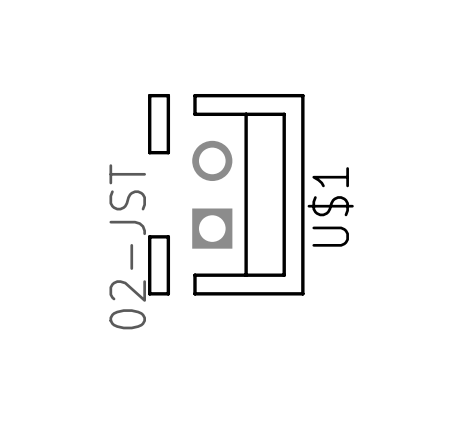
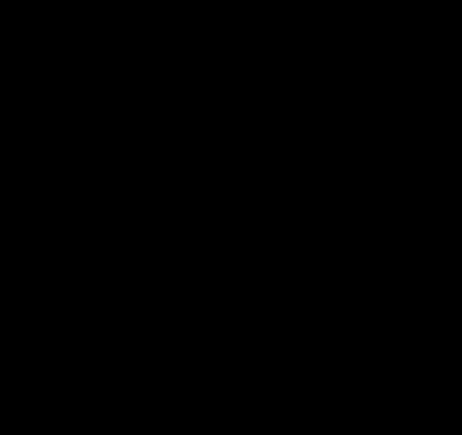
U$1: 02-JST (226, 194) -> none

